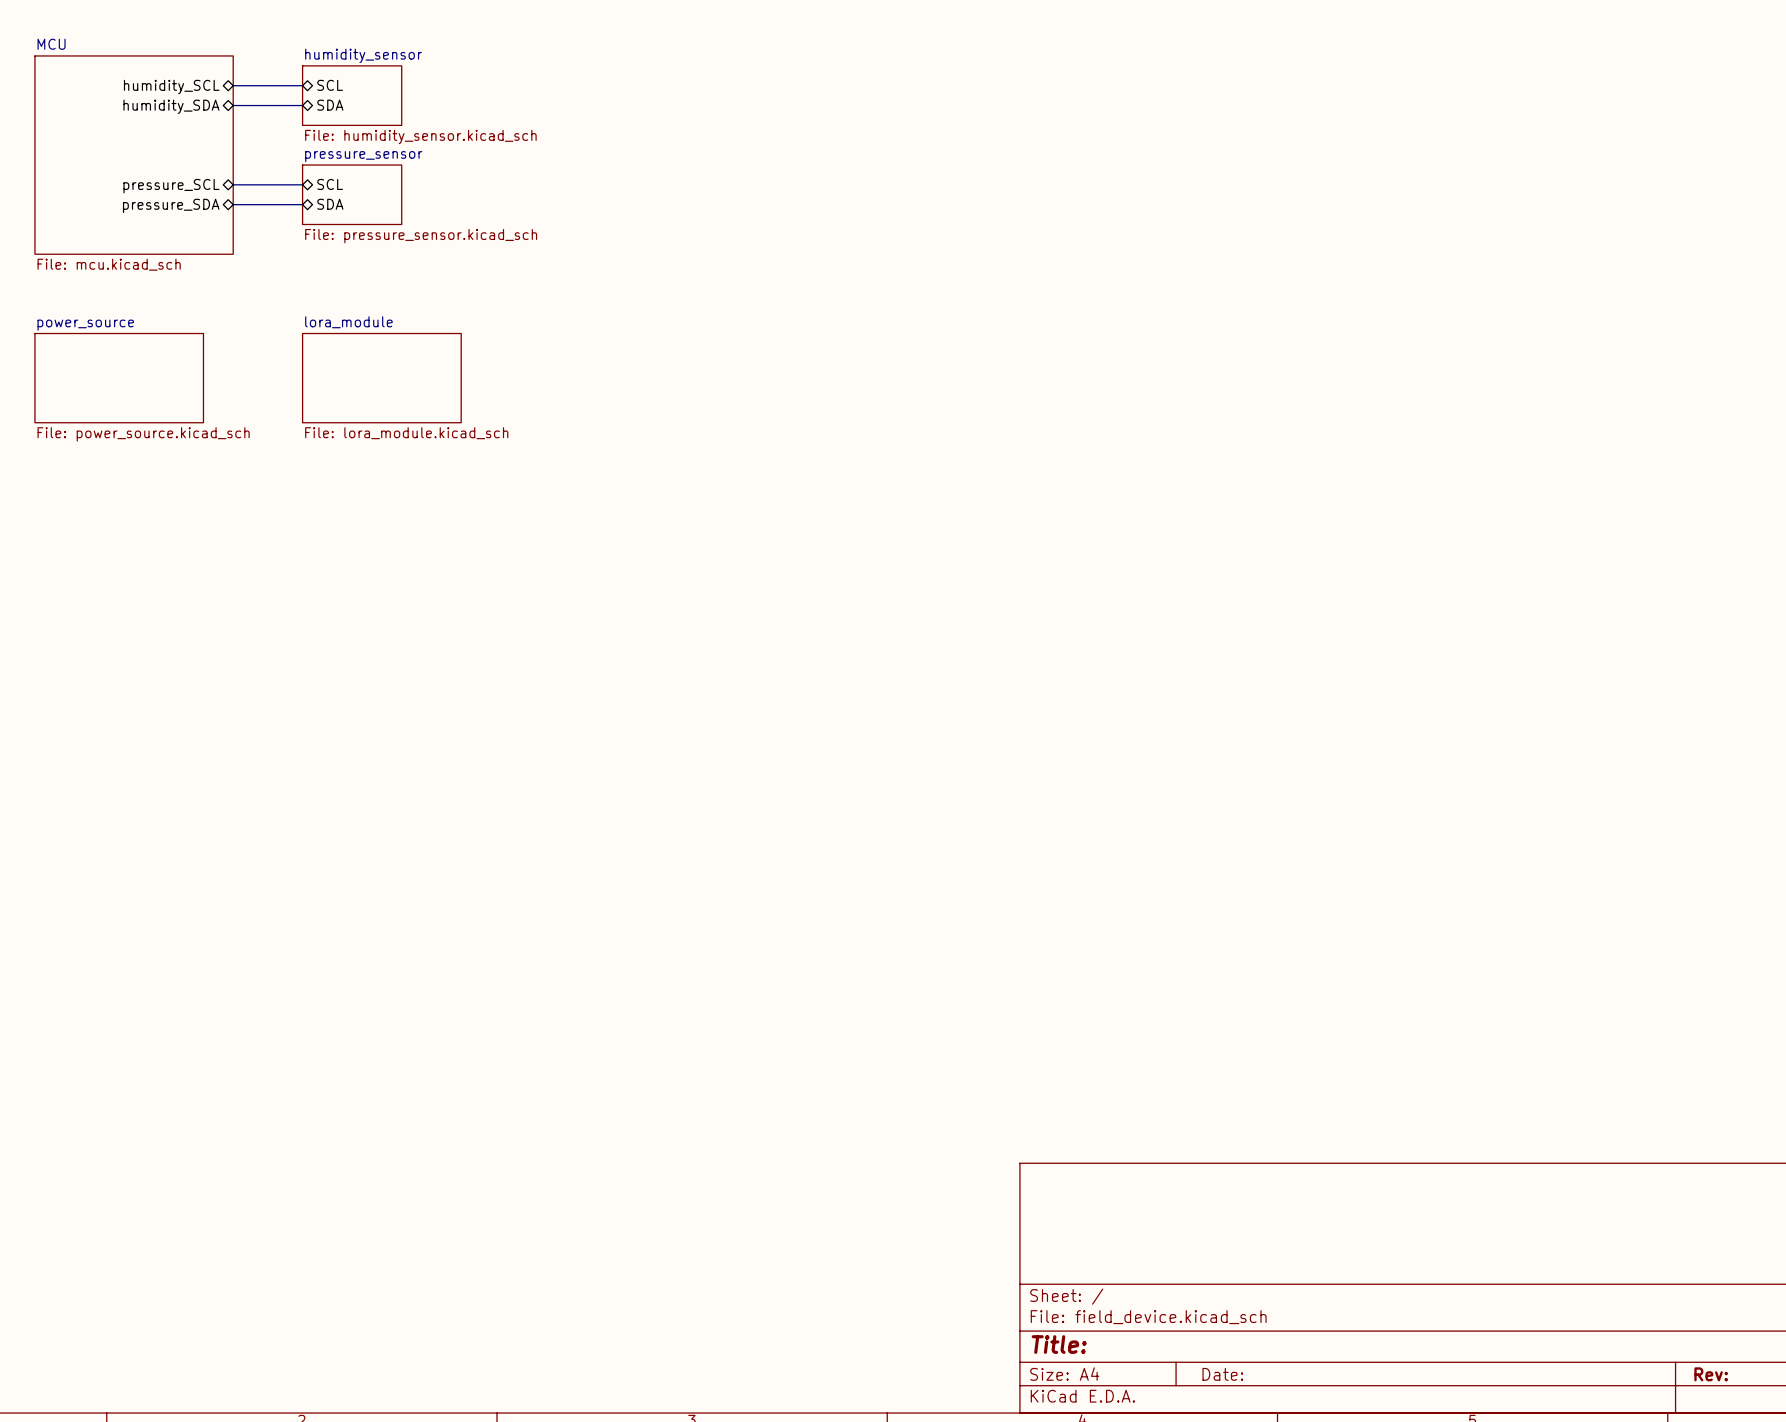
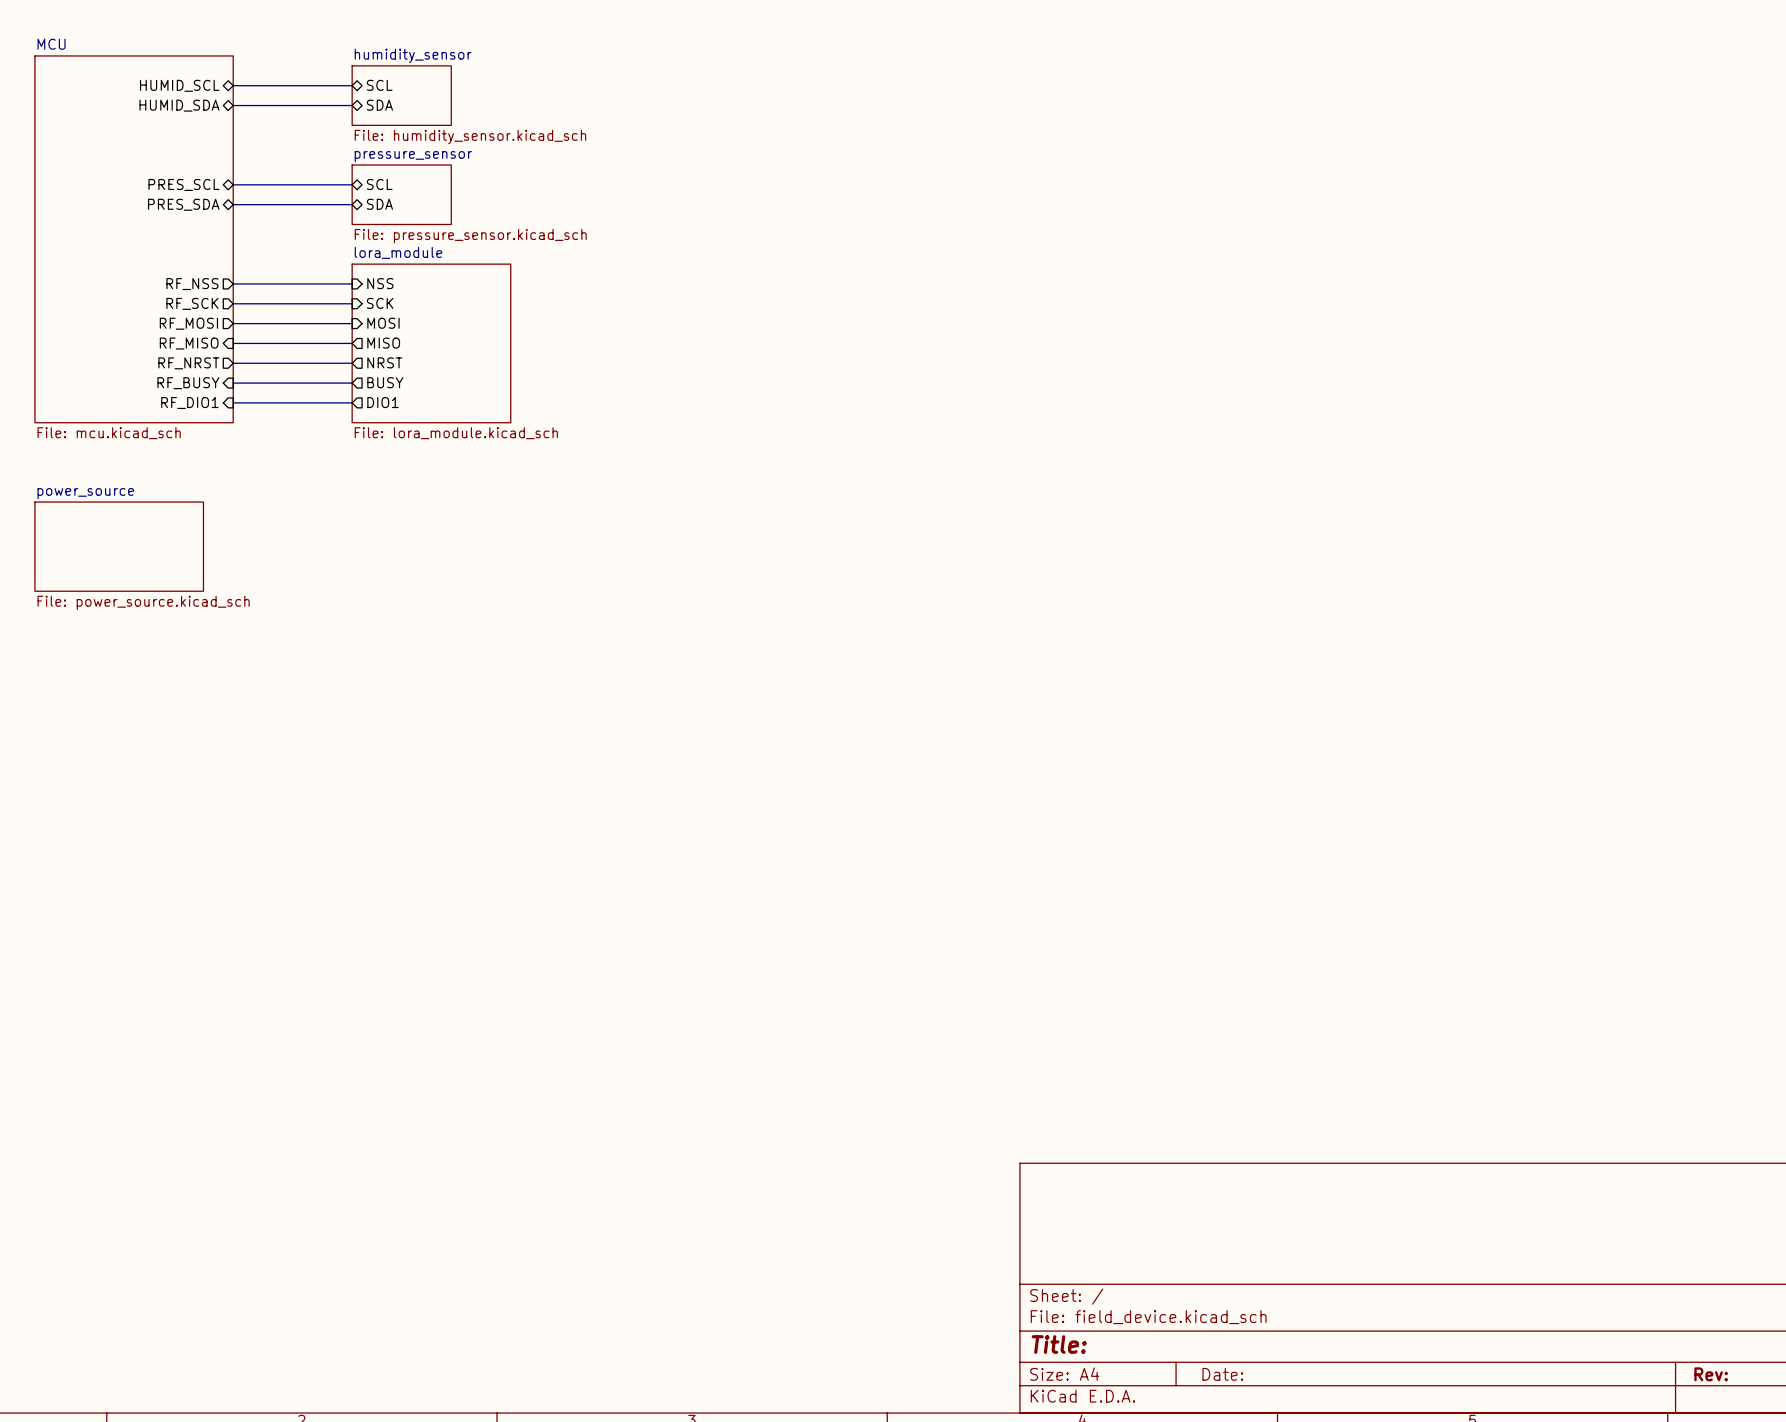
wire: none -> (302, 85) (352, 85)
sheet pin position: SCL (330, 85) -> SCL (379, 85)
sheet pin: humidity_SCL (171, 86) -> HUMID_SCL (179, 85)
sheet humidity_sensor position: (352, 95) -> (401, 95)
wire: none -> (302, 105) (352, 105)
sheet pin position: SDA (330, 105) -> SDA (379, 105)
sheet pin: humidity_SDA (171, 106) -> HUMID_SDA (179, 105)
sheet MCU: File: mcu.kicad_sch (134, 155) -> none
wire: none -> (302, 184) (352, 184)
sheet pin position: SCL (330, 184) -> SCL (379, 184)
sheet pin: pressure_SCL (171, 186) -> PRES_SCL (183, 184)
sheet pressure_sensor position: (352, 194) -> (401, 194)
wire: none -> (302, 204) (352, 204)
sheet pin position: SDA (330, 204) -> SDA (379, 204)
sheet pin: pressure_SDA (171, 205) -> PRES_SDA (183, 204)
sheet MCU: none -> File: mcu.kicad_sch (134, 239)
wire: none -> (233, 283) (352, 283)
sheet pin: none -> NSS (380, 283)
sheet pin: none -> RF_NSS (192, 284)
sheet pin: none -> RF_SCK (192, 303)
wire: none -> (233, 303) (352, 303)
sheet pin: none -> SCK (380, 303)
sheet pin: none -> RF_MOSI (188, 323)
wire: none -> (233, 323) (352, 323)
sheet pin: none -> MOSI (383, 323)
sheet pin: none -> RF_MISO (189, 343)
wire: none -> (233, 343) (352, 343)
sheet pin: none -> MISO (383, 343)
sheet lora_module: none -> File: lora_module.kicad_sch (431, 343)
sheet pin: none -> NRST (384, 362)
sheet pin: none -> RF_NRST (188, 363)
wire: none -> (233, 363) (352, 363)
sheet power_source position: (119, 378) -> (119, 546)
sheet lora_module: File: lora_module.kicad_sch (381, 378) -> none
sheet pin: none -> BUSY (385, 382)
sheet pin: none -> RF_BUSY (188, 383)
wire: none -> (233, 383) (352, 383)
wire: none -> (233, 402) (352, 402)
sheet pin: none -> DIO1 (382, 402)
sheet pin: none -> RF_DIO1 (189, 403)

